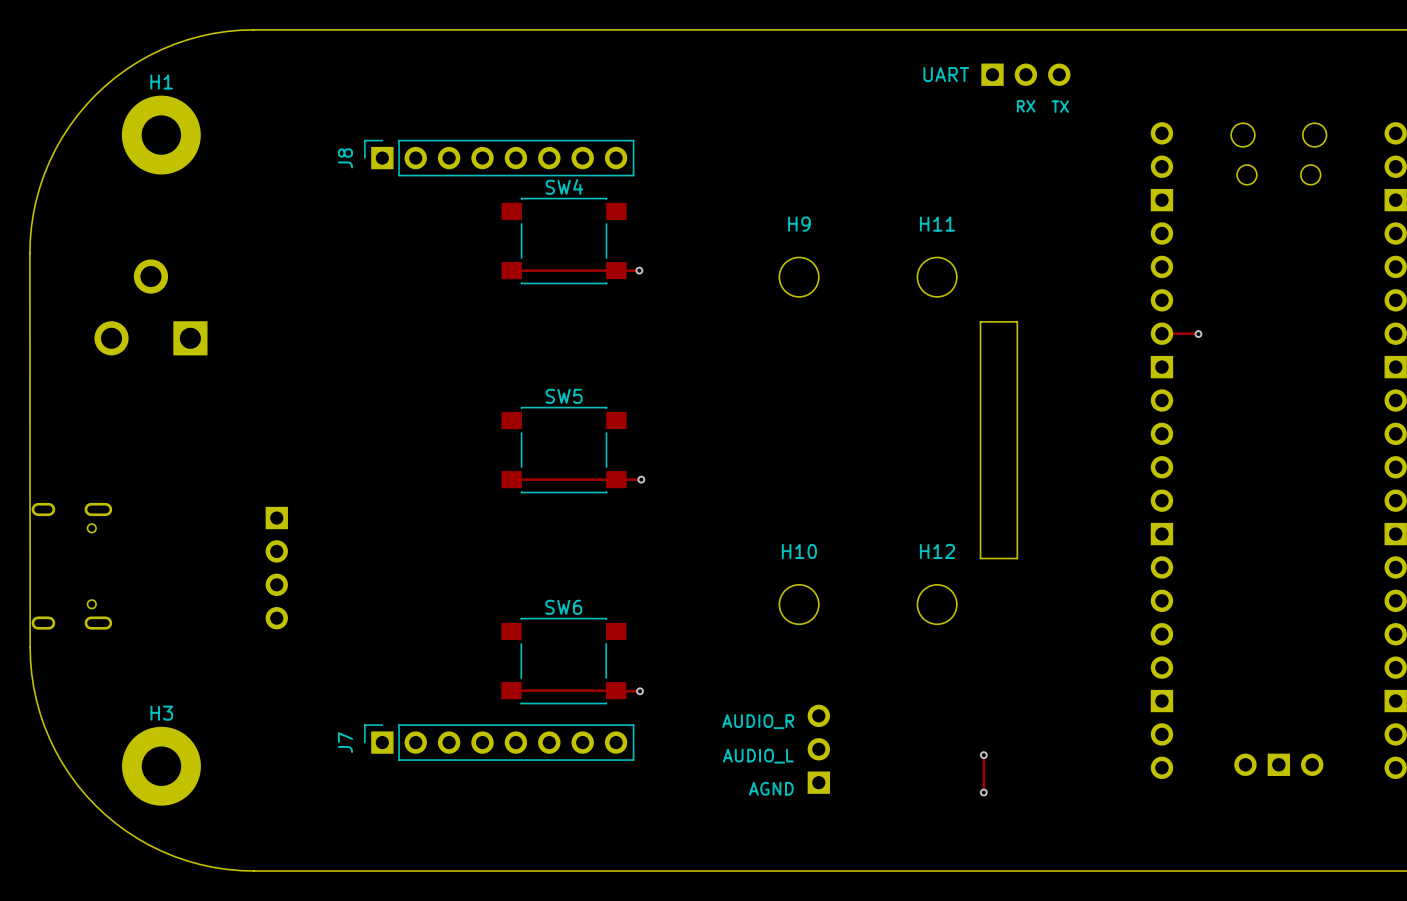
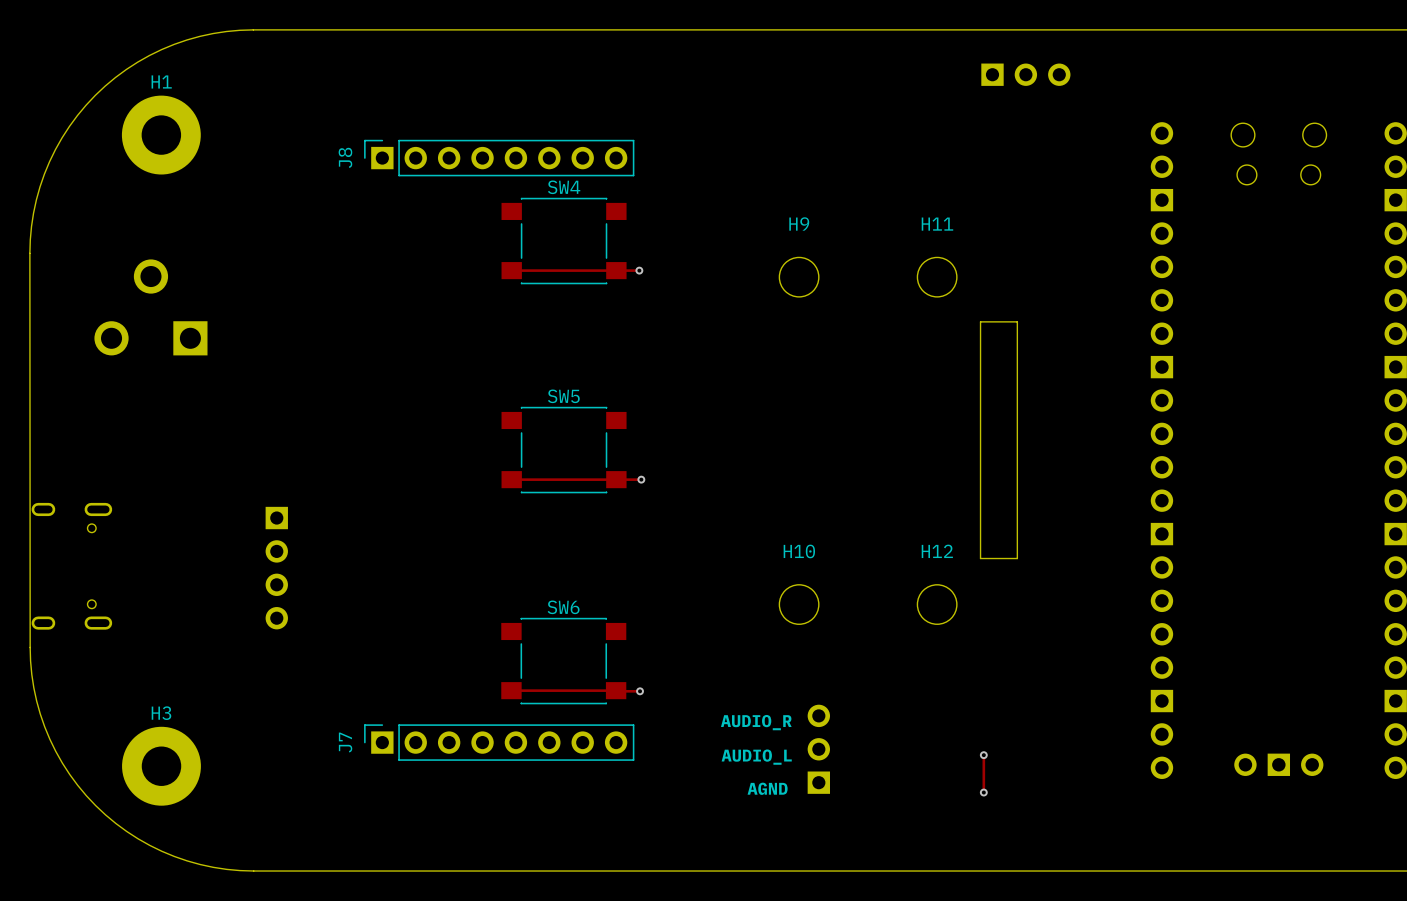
part value: UART (946, 74) -> none
text: RX (1026, 106) -> none
text: TX (1060, 106) -> none
track: (1161, 333) (1198, 334) -> none
via: (1198, 334) -> none

